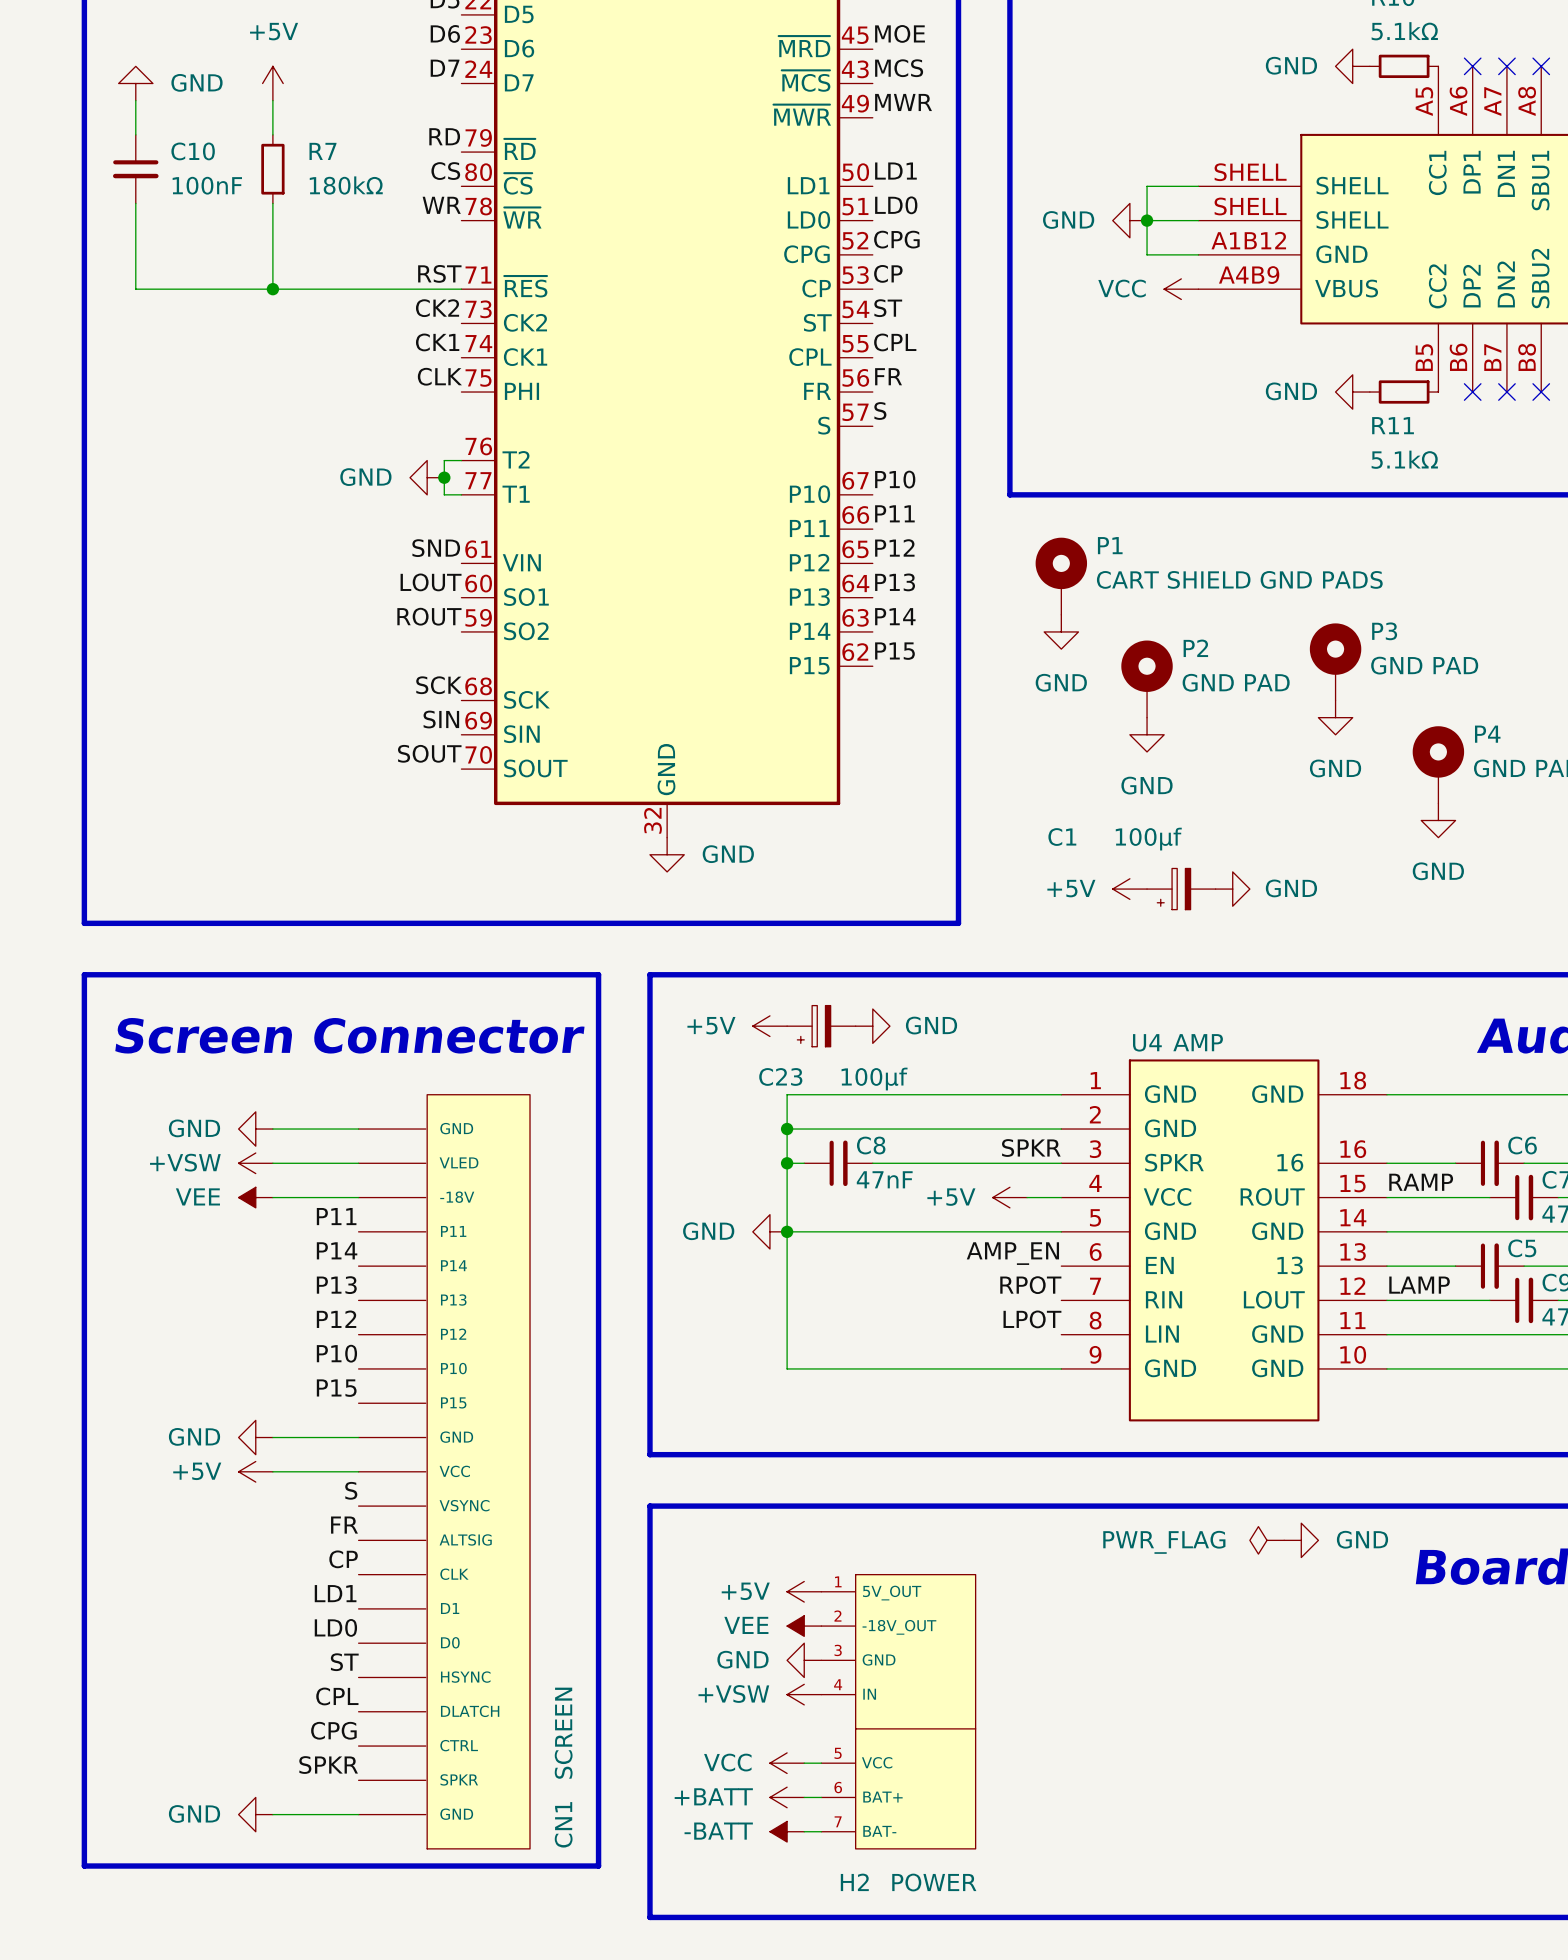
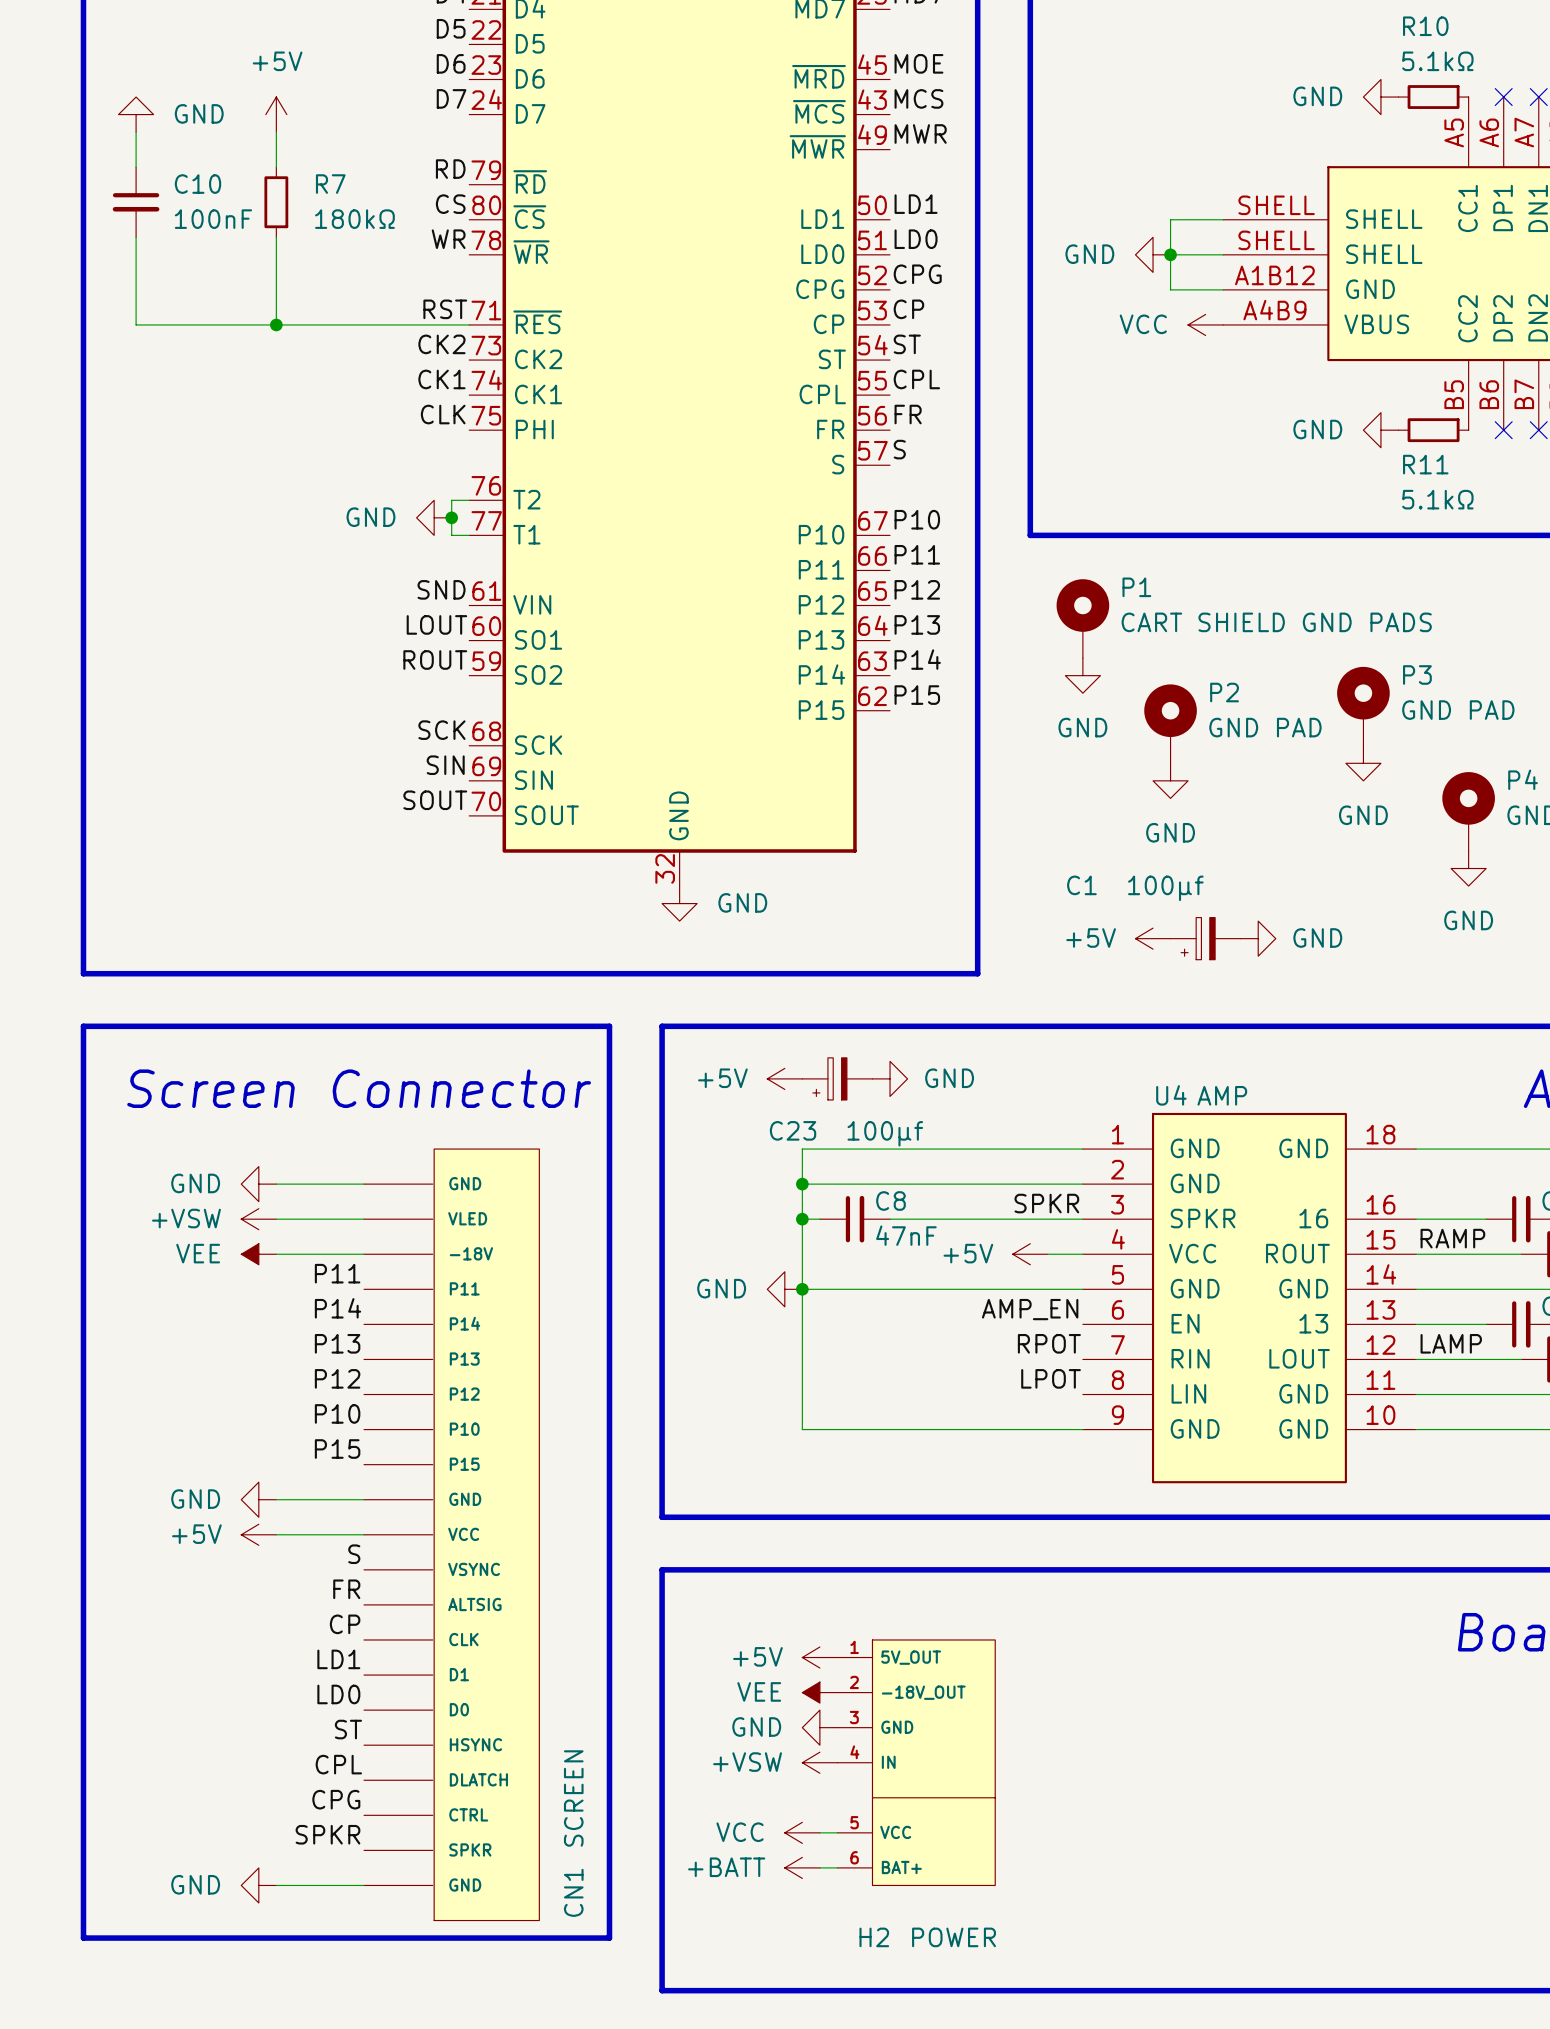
power symbol: PWR_FLAG (1267, 1540) -> none
power symbol: GND (1301, 1540) -> none
H2 symbol: [821, 1574, 976, 1849] -> [837, 1639, 996, 1886]
power symbol: -BATT (787, 1831) -> none
wire: (804, 1831) (821, 1831) -> none

